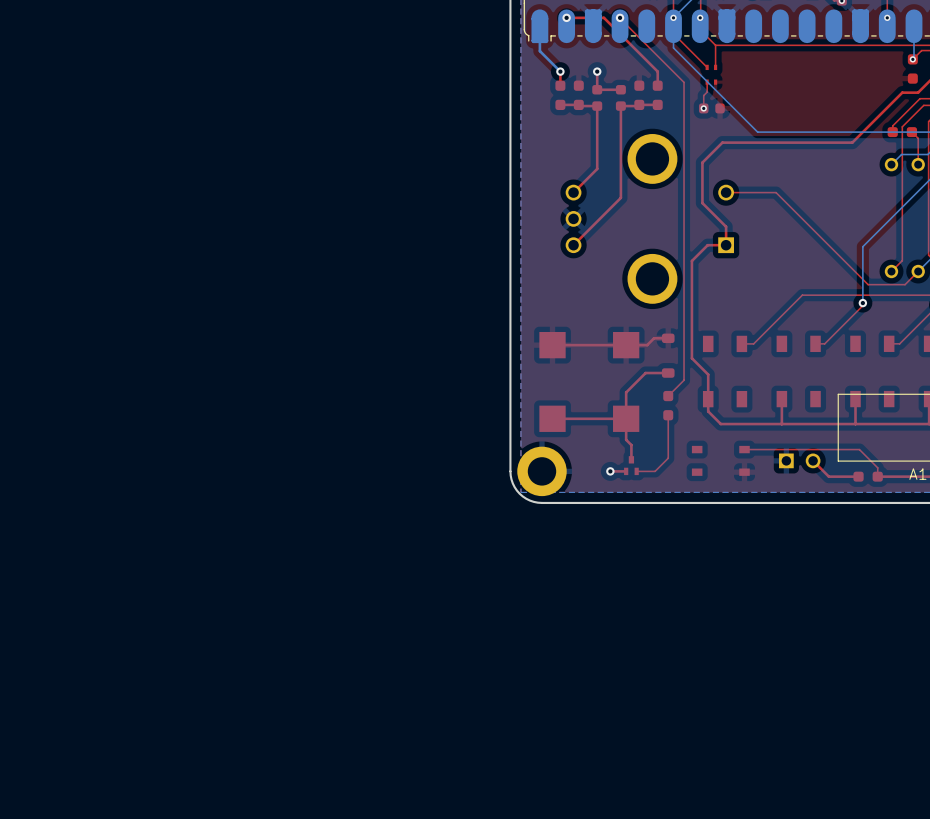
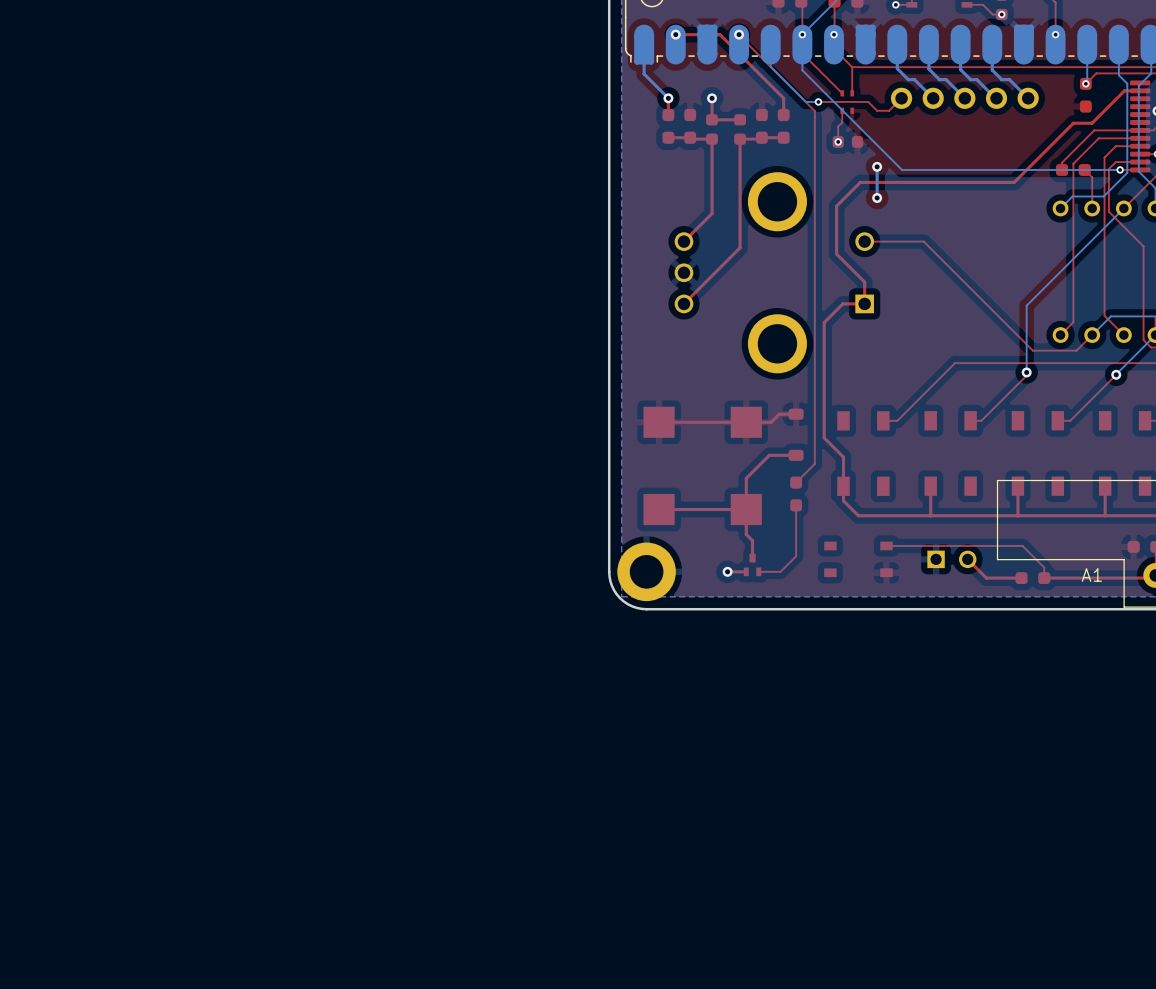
bottom track: none -> (770, 34) (770, 66) (806, 101) (818, 101)
bottom track: none -> (897, 34) (897, 68) (908, 79) (914, 79) (933, 98)
bottom track: none -> (928, 34) (928, 69) (939, 79) (946, 79) (964, 98)
bottom track: none -> (960, 34) (960, 69) (970, 79) (976, 79) (996, 98)
bottom track: none -> (992, 34) (992, 70) (1001, 79) (1009, 79) (1028, 98)
top track: none -> (901, 98) (889, 110) (877, 110) (868, 101) (818, 101)
part: none -> (964, 98)
via: none -> (818, 101)
bottom track: none -> (877, 166) (877, 198)
via: none -> (877, 166)
via: none -> (877, 198)

